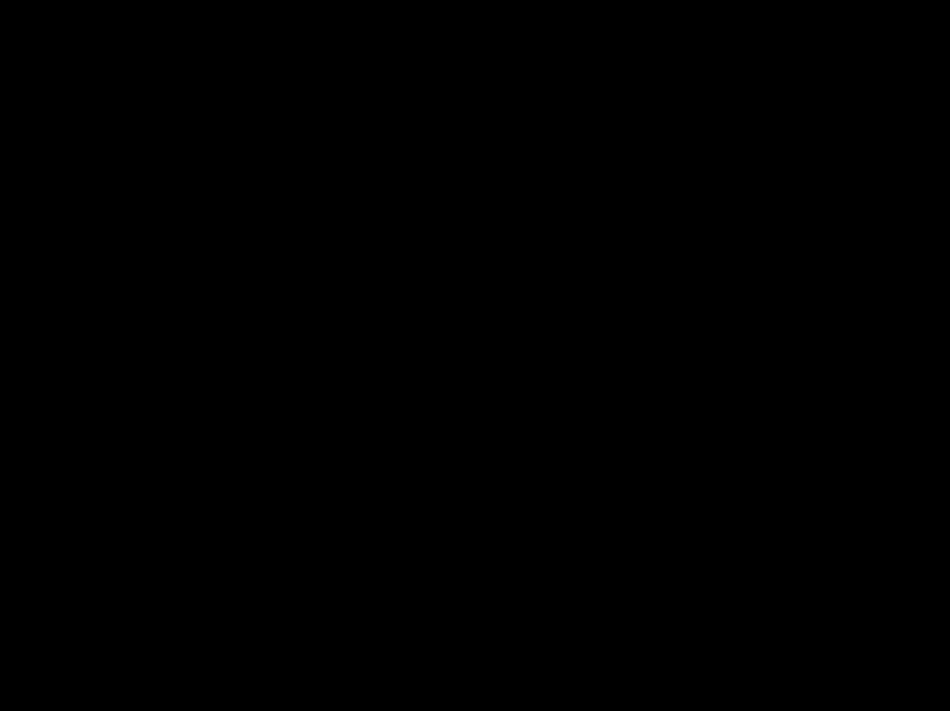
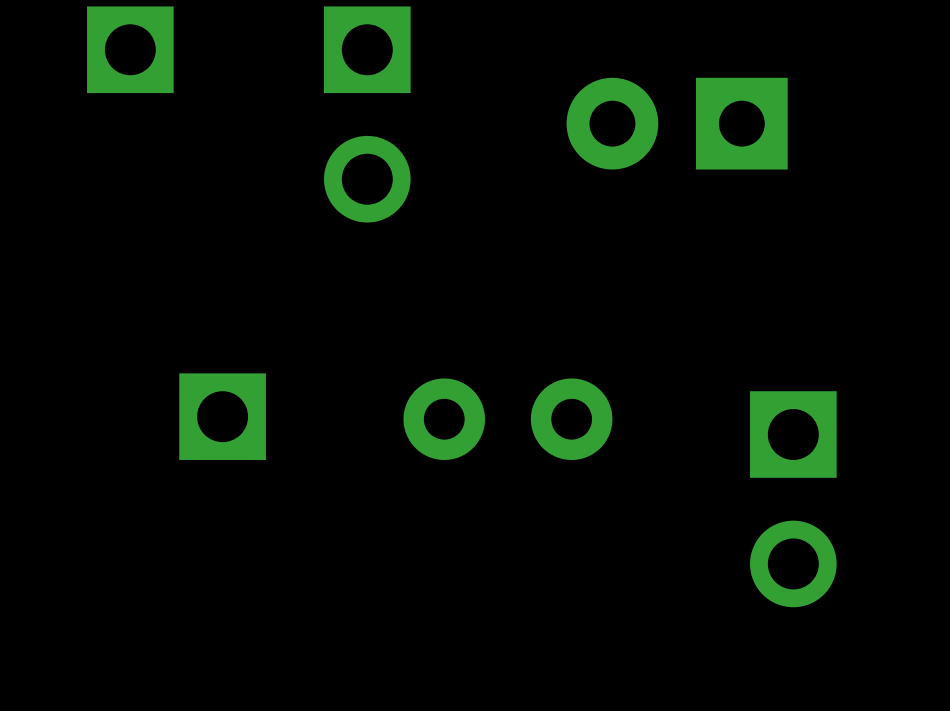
part: none -> (130, 49)
part: none -> (367, 114)
part: none -> (677, 123)
part: none -> (222, 416)
part: none -> (507, 419)
part: none -> (793, 499)

